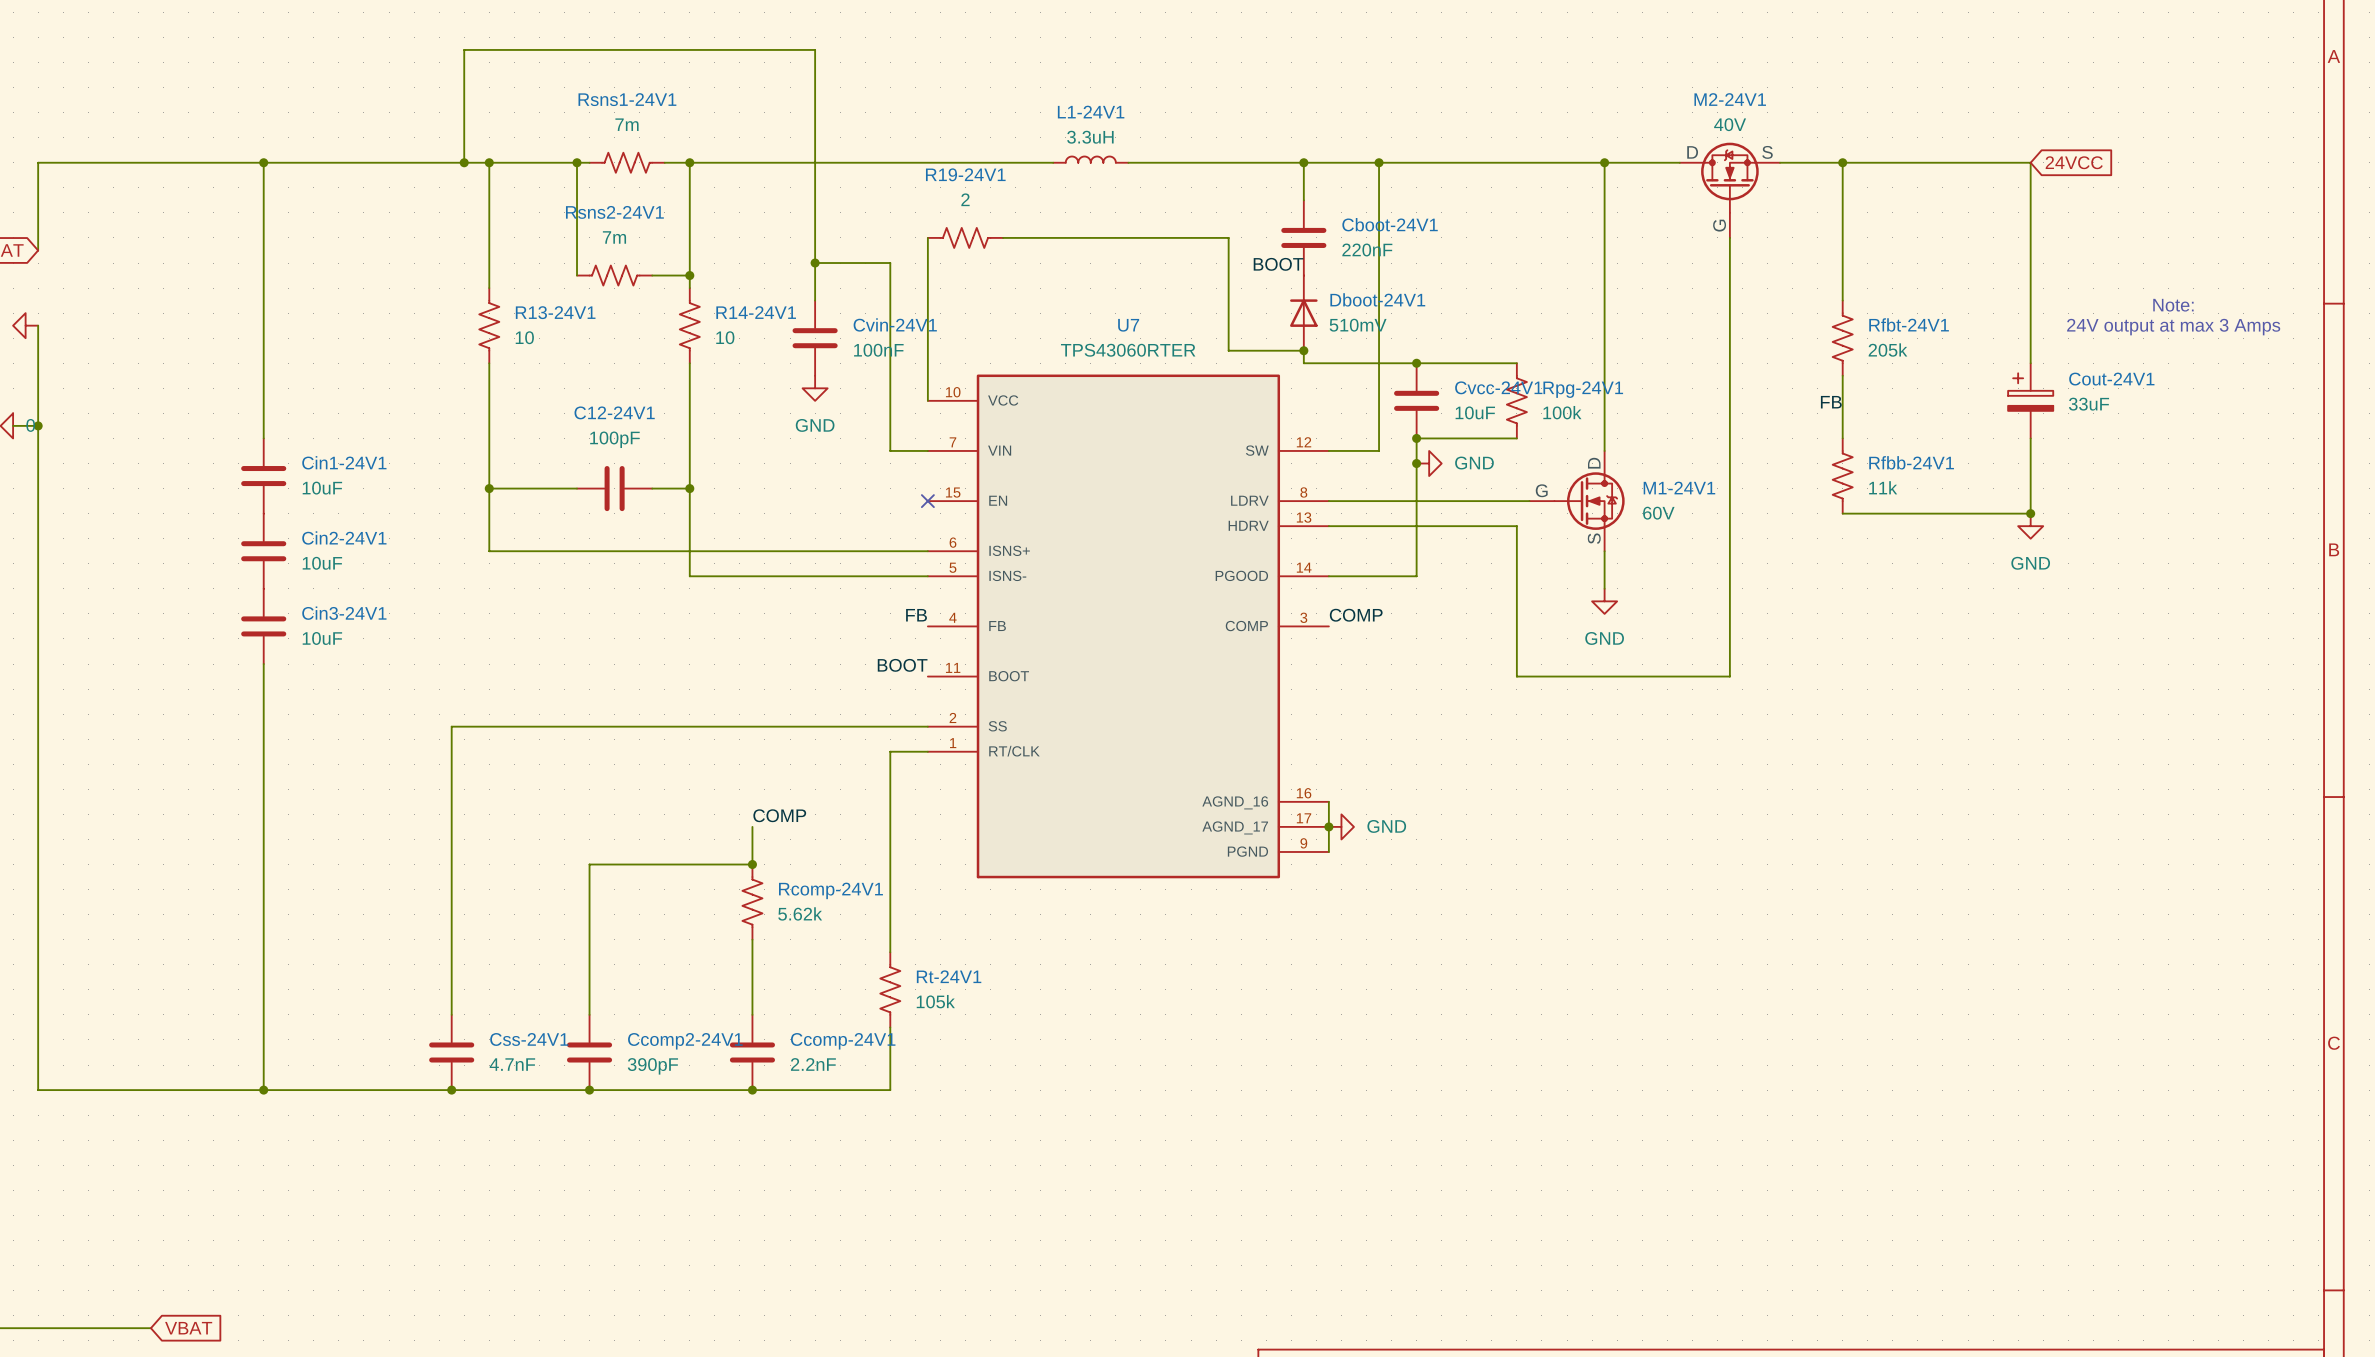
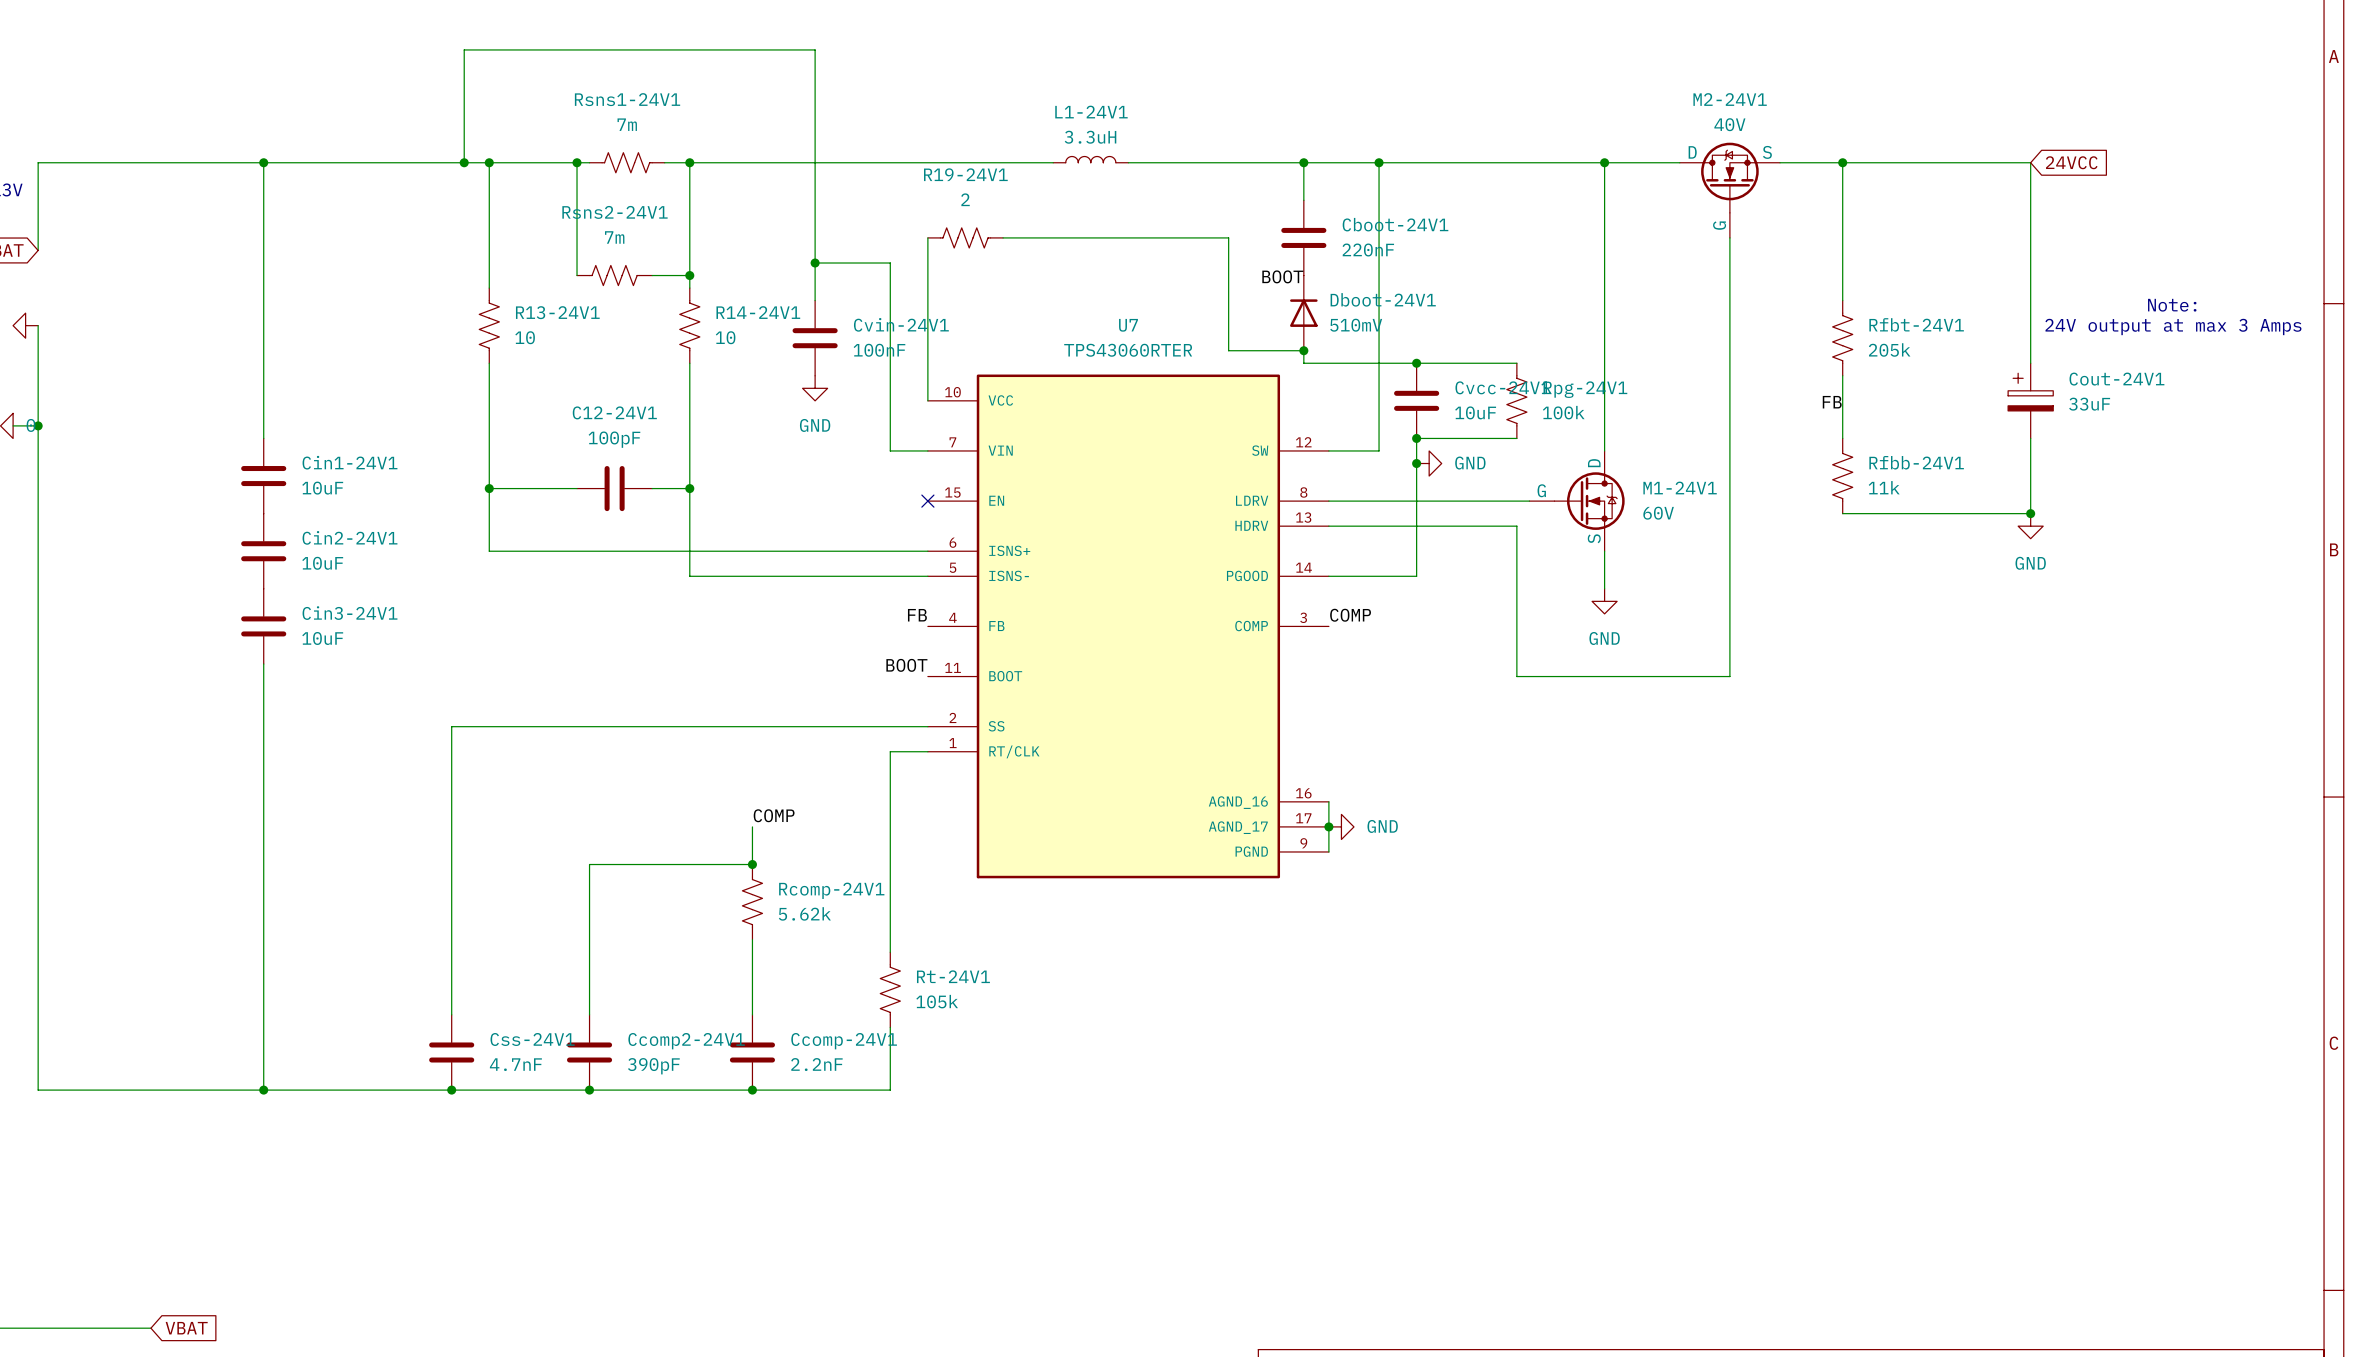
label position: BOOT (1278, 264) -> BOOT (1282, 276)

